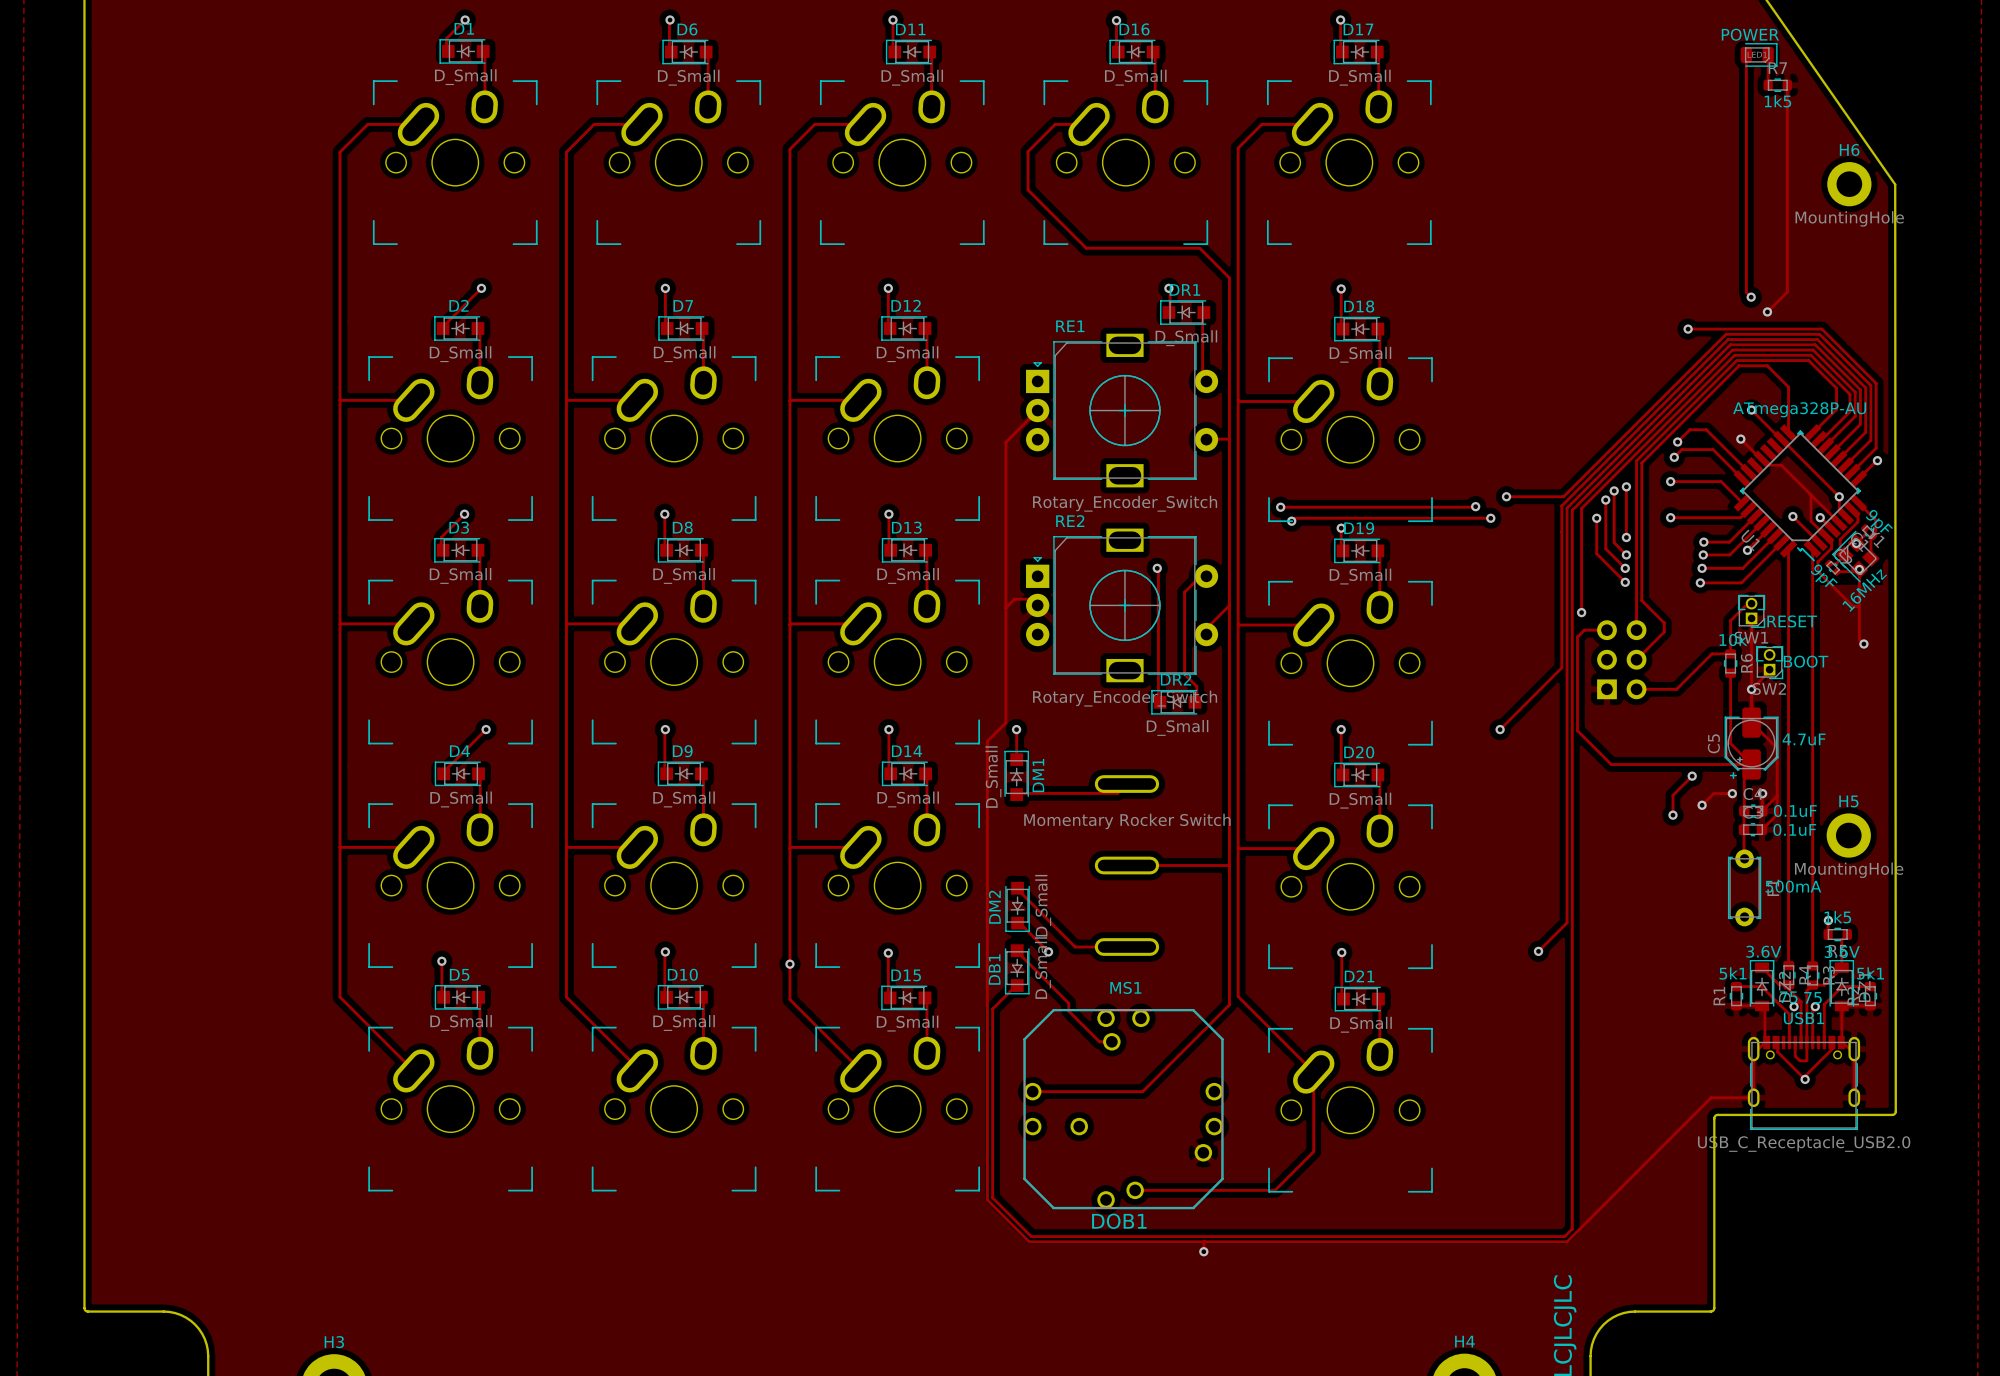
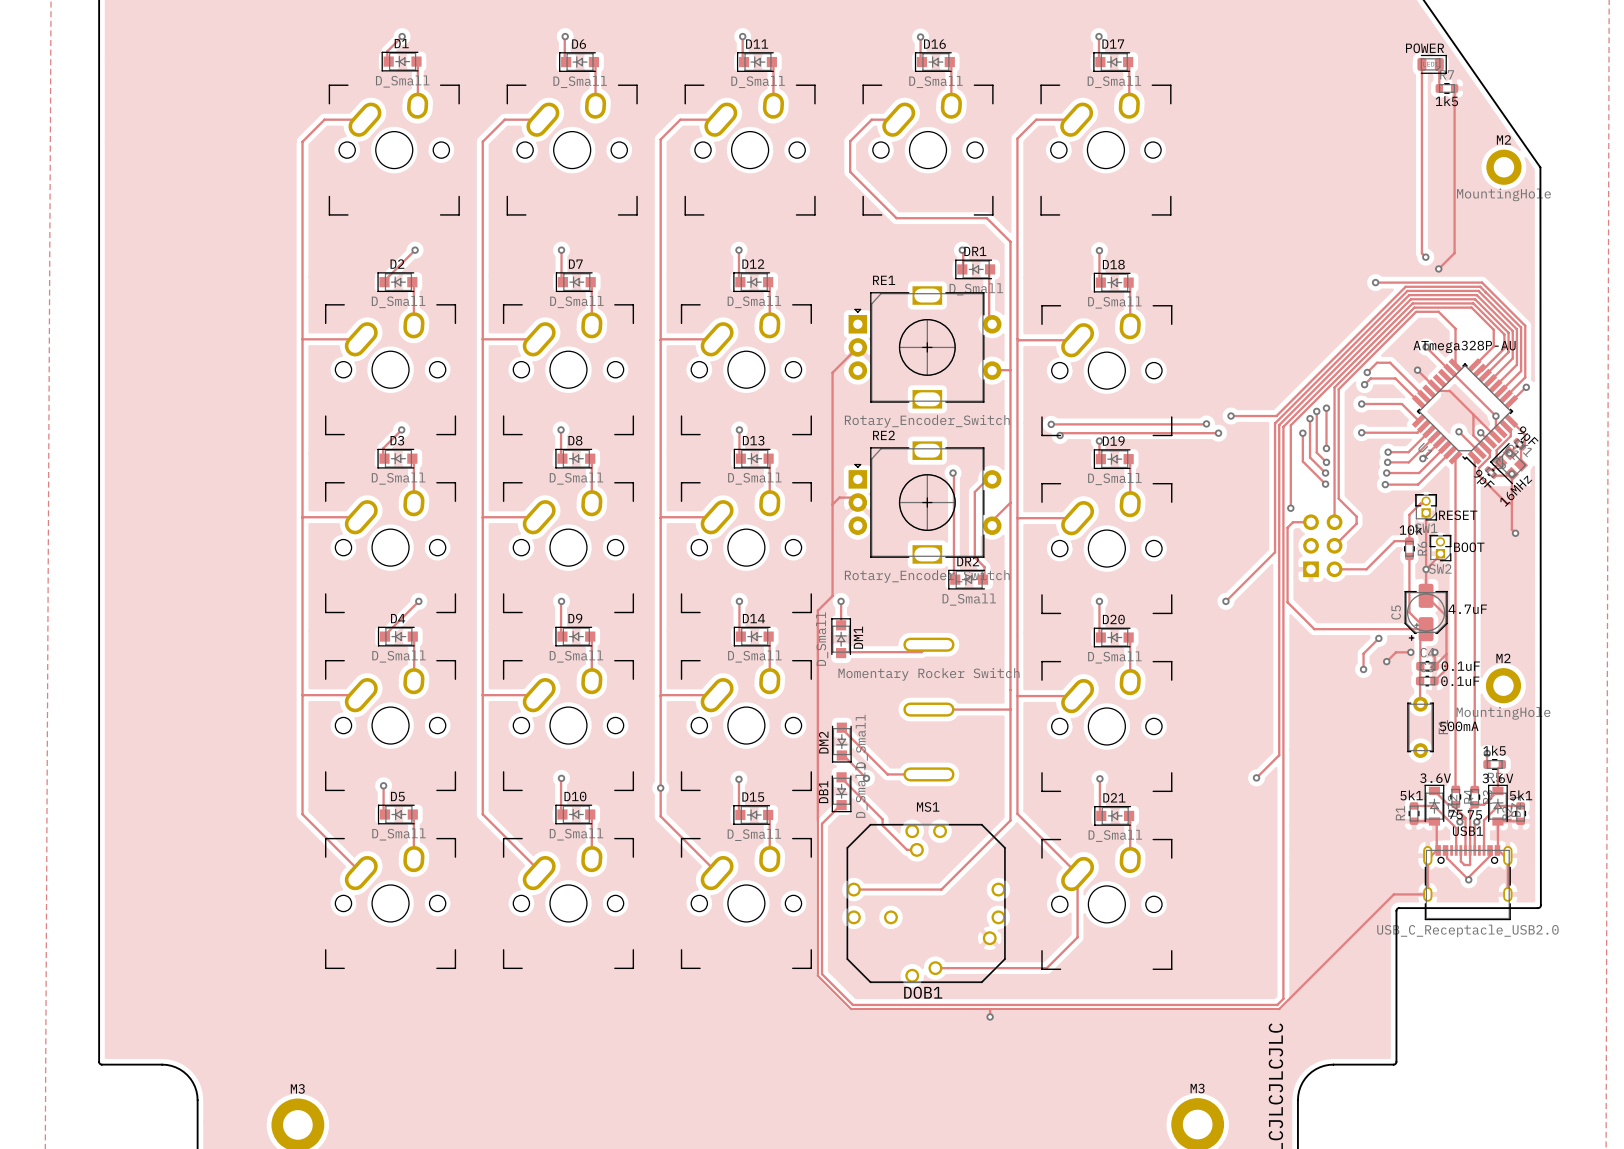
H6 name: H6 (1849, 149) -> M2 (1503, 139)
H5 name: H5 (1848, 801) -> M2 (1503, 658)
H4 name: H4 (1464, 1341) -> M3 (1197, 1088)
H3 name: H3 (334, 1342) -> M3 (297, 1088)

